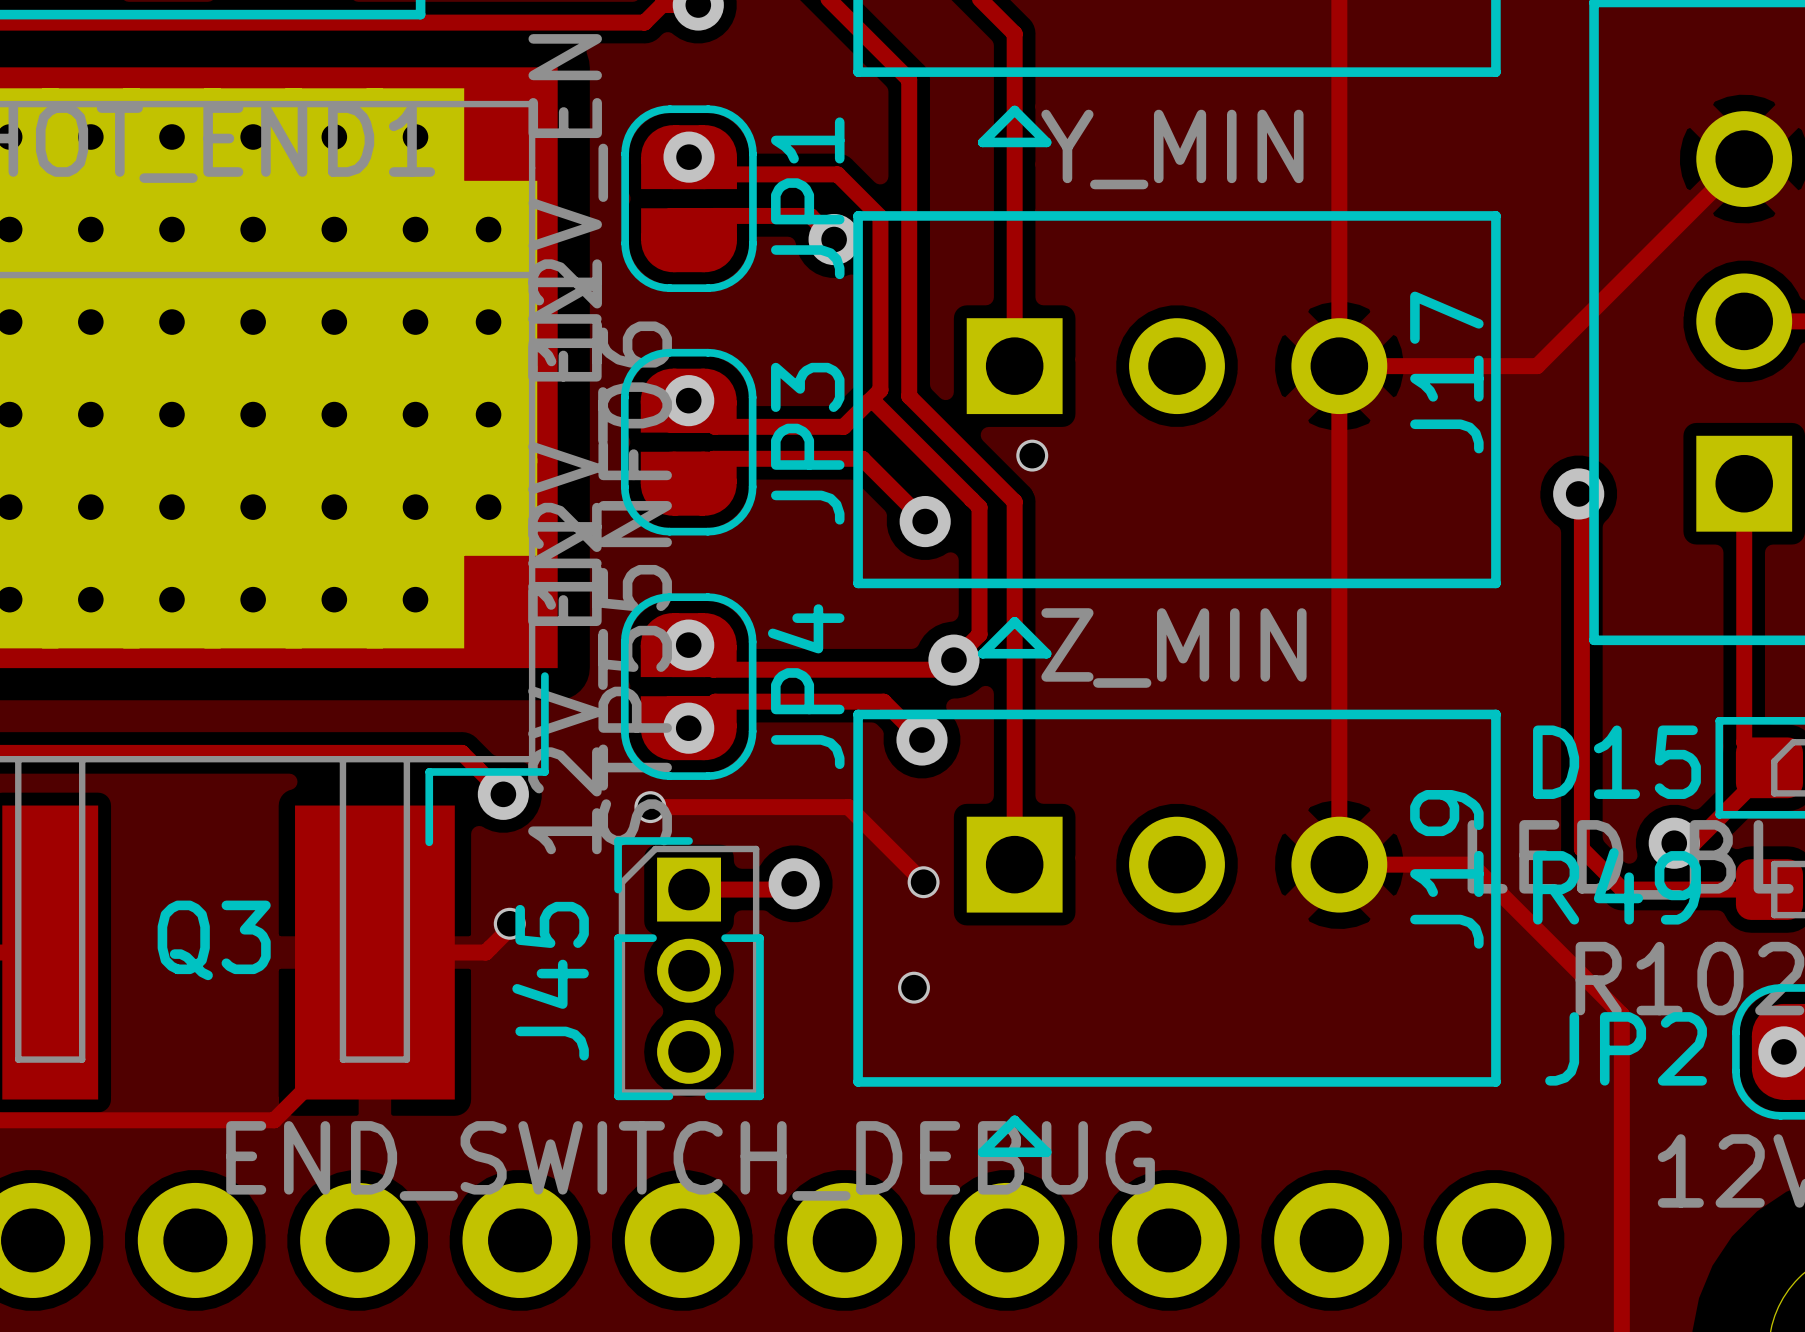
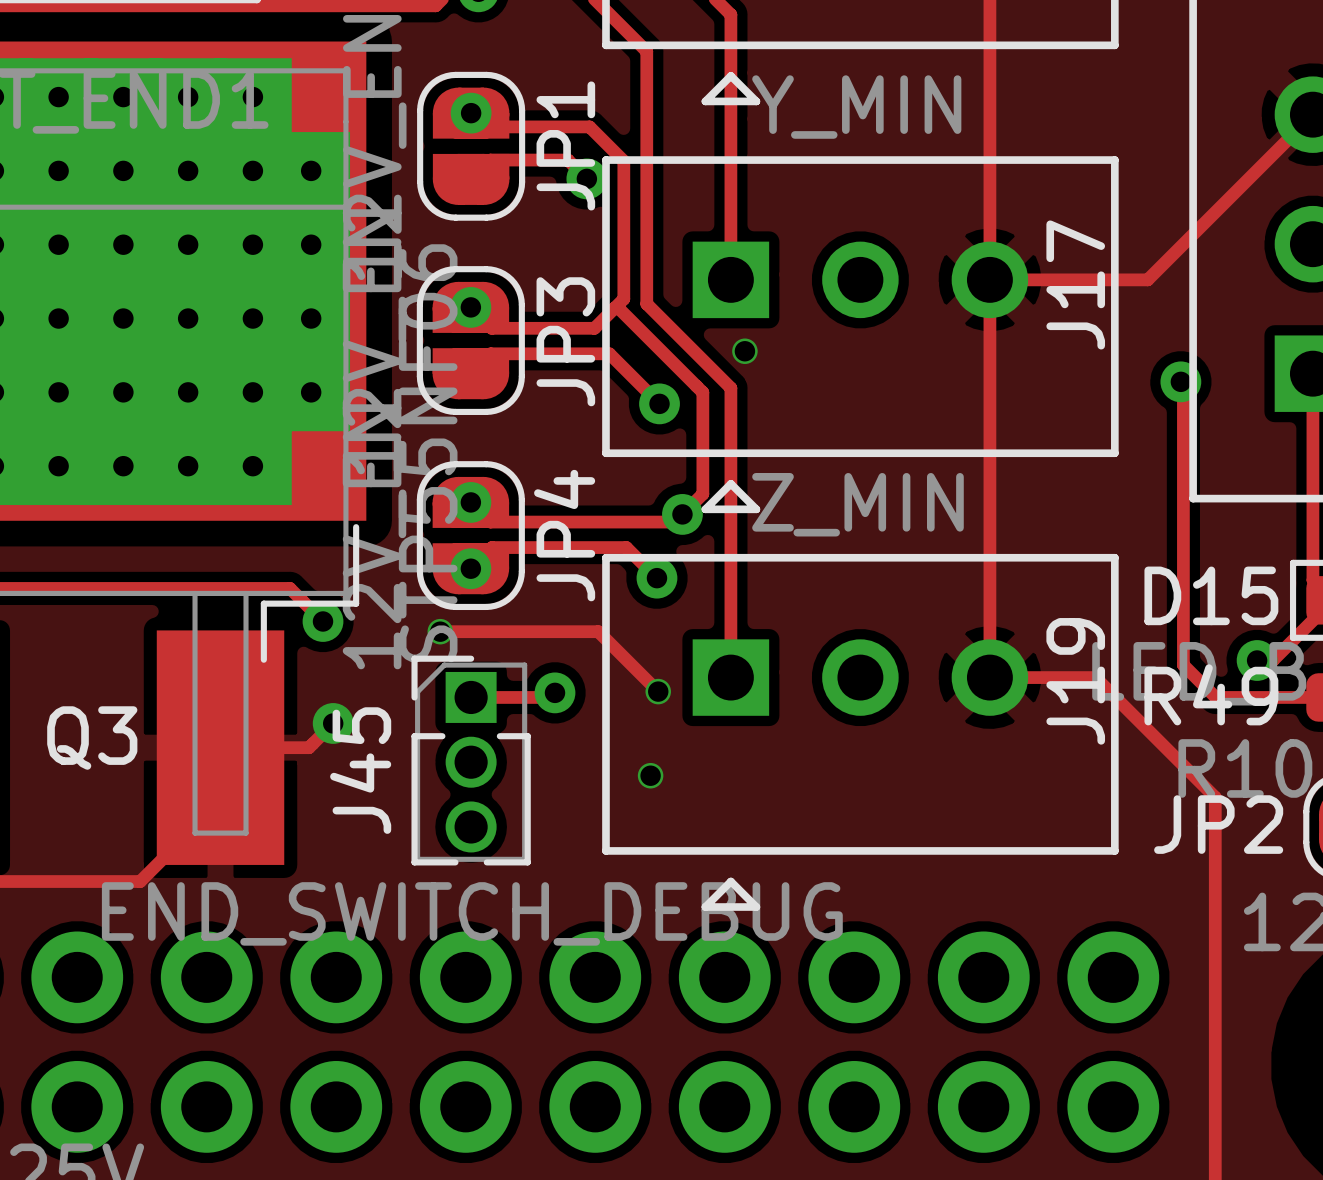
via size: [493, 907, 526, 940] -> [312, 703, 354, 744]

